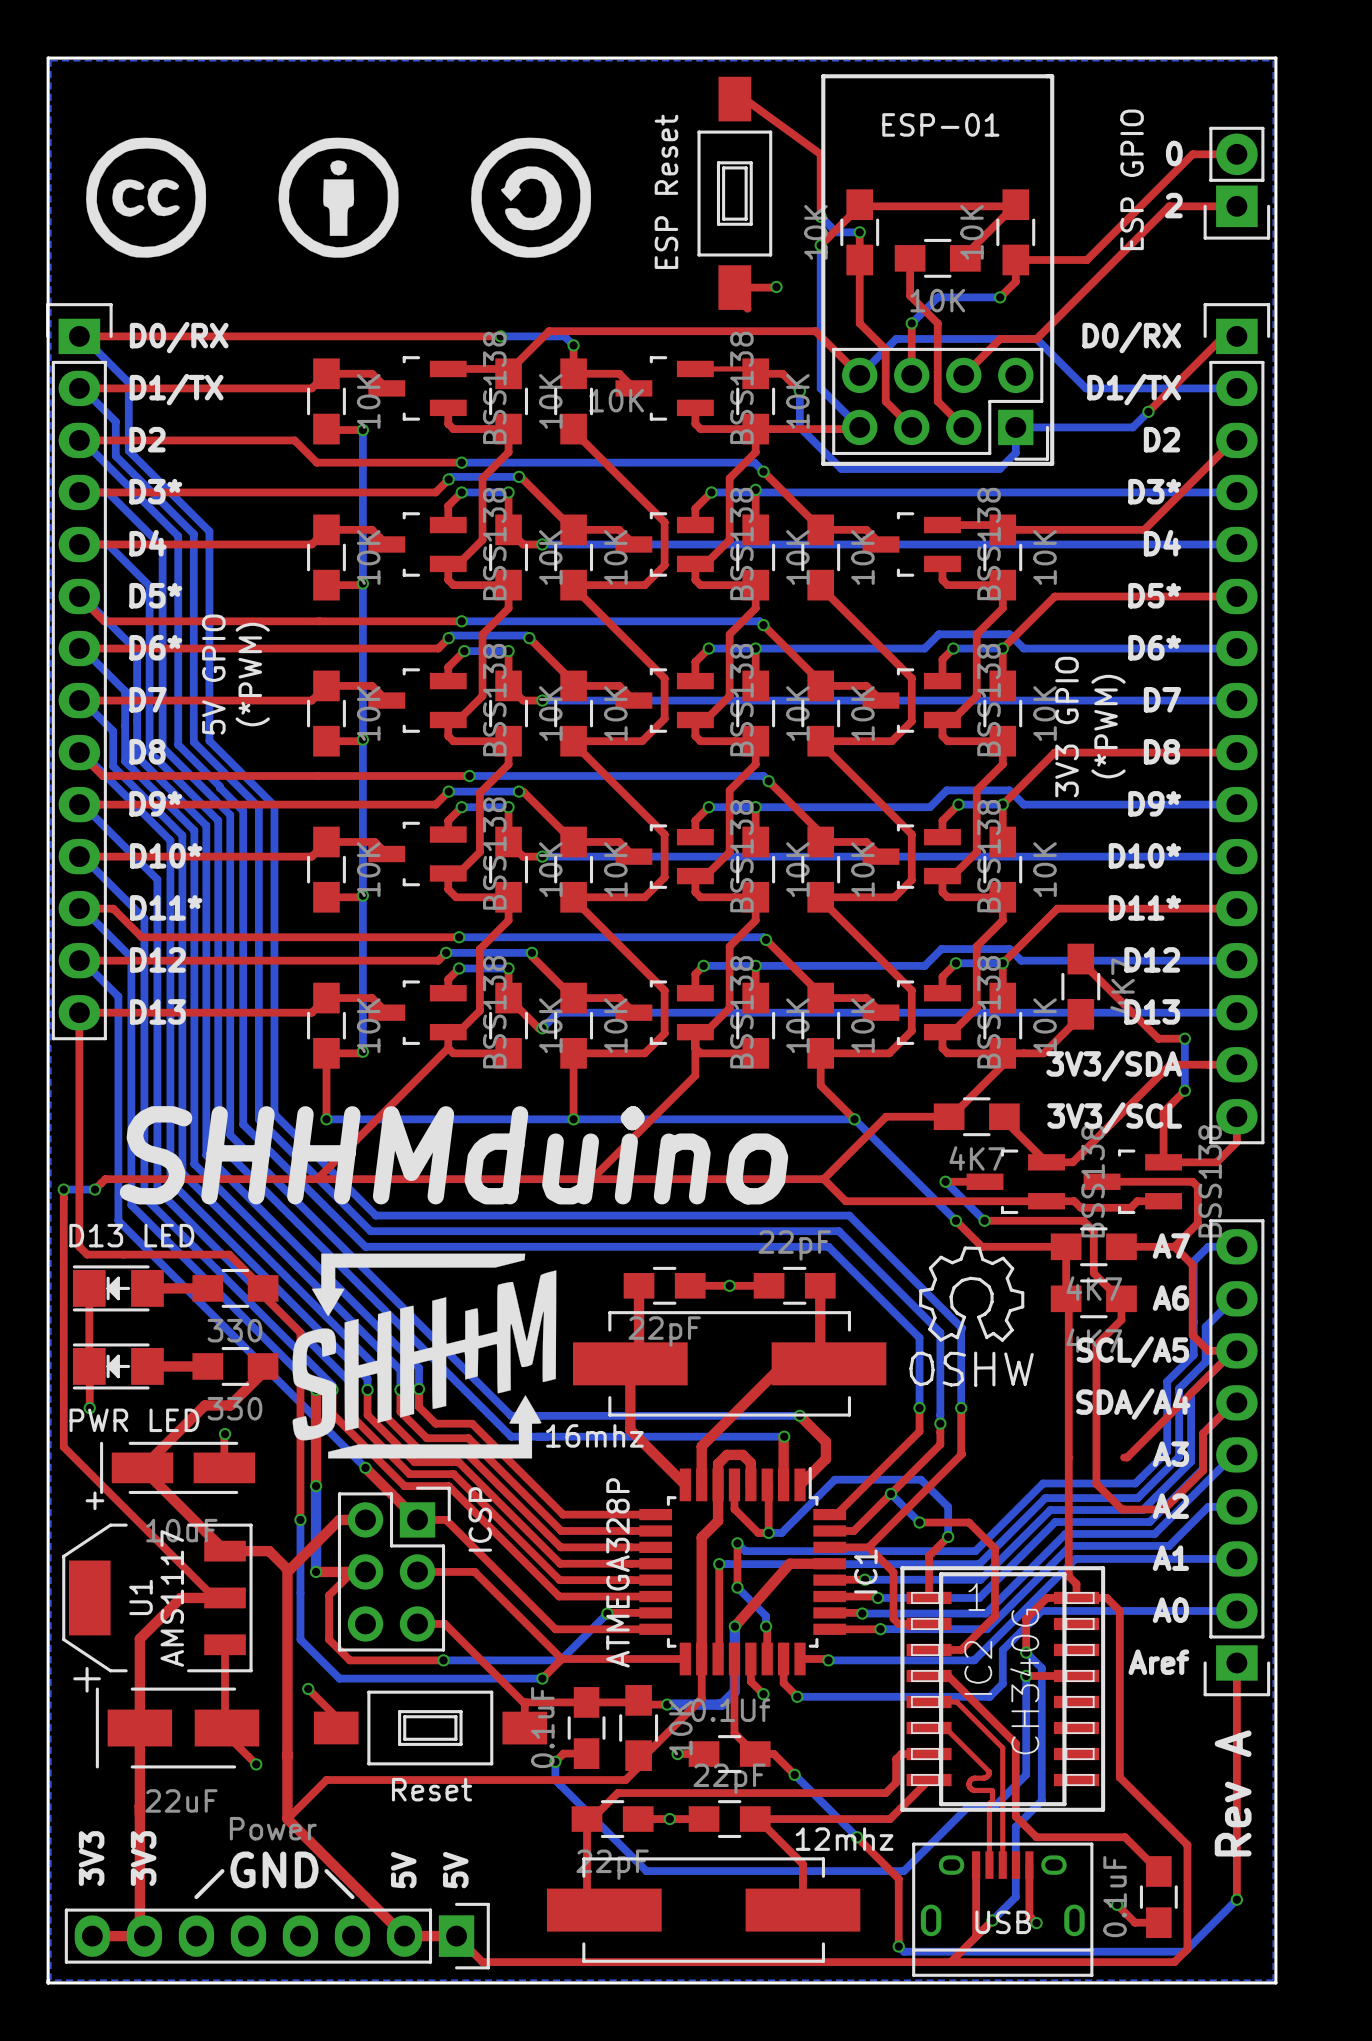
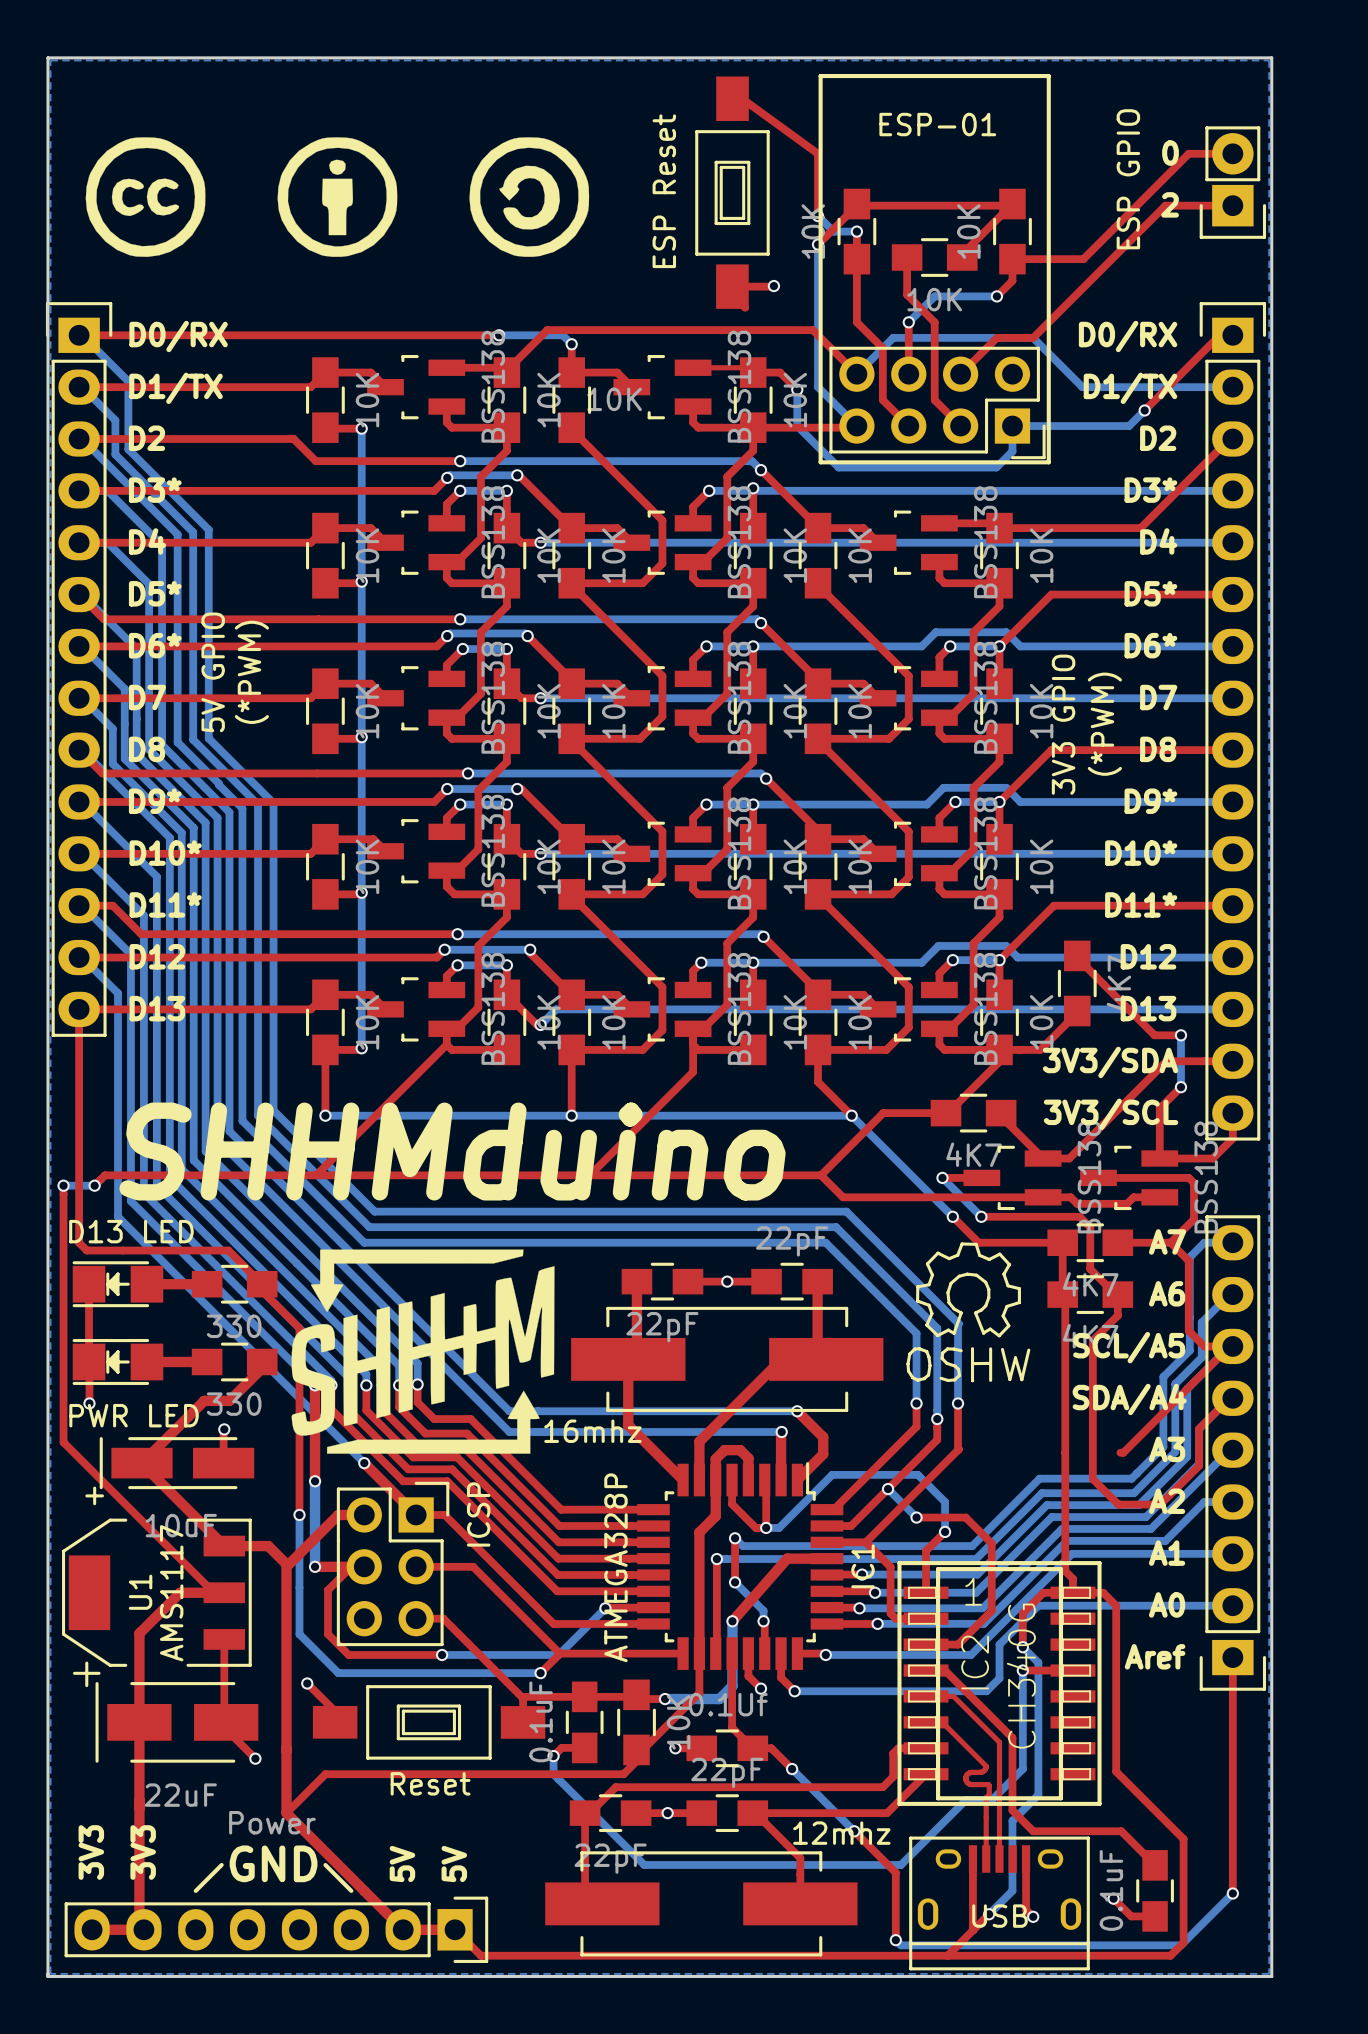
text: Rev A (1233, 1793) -> none

